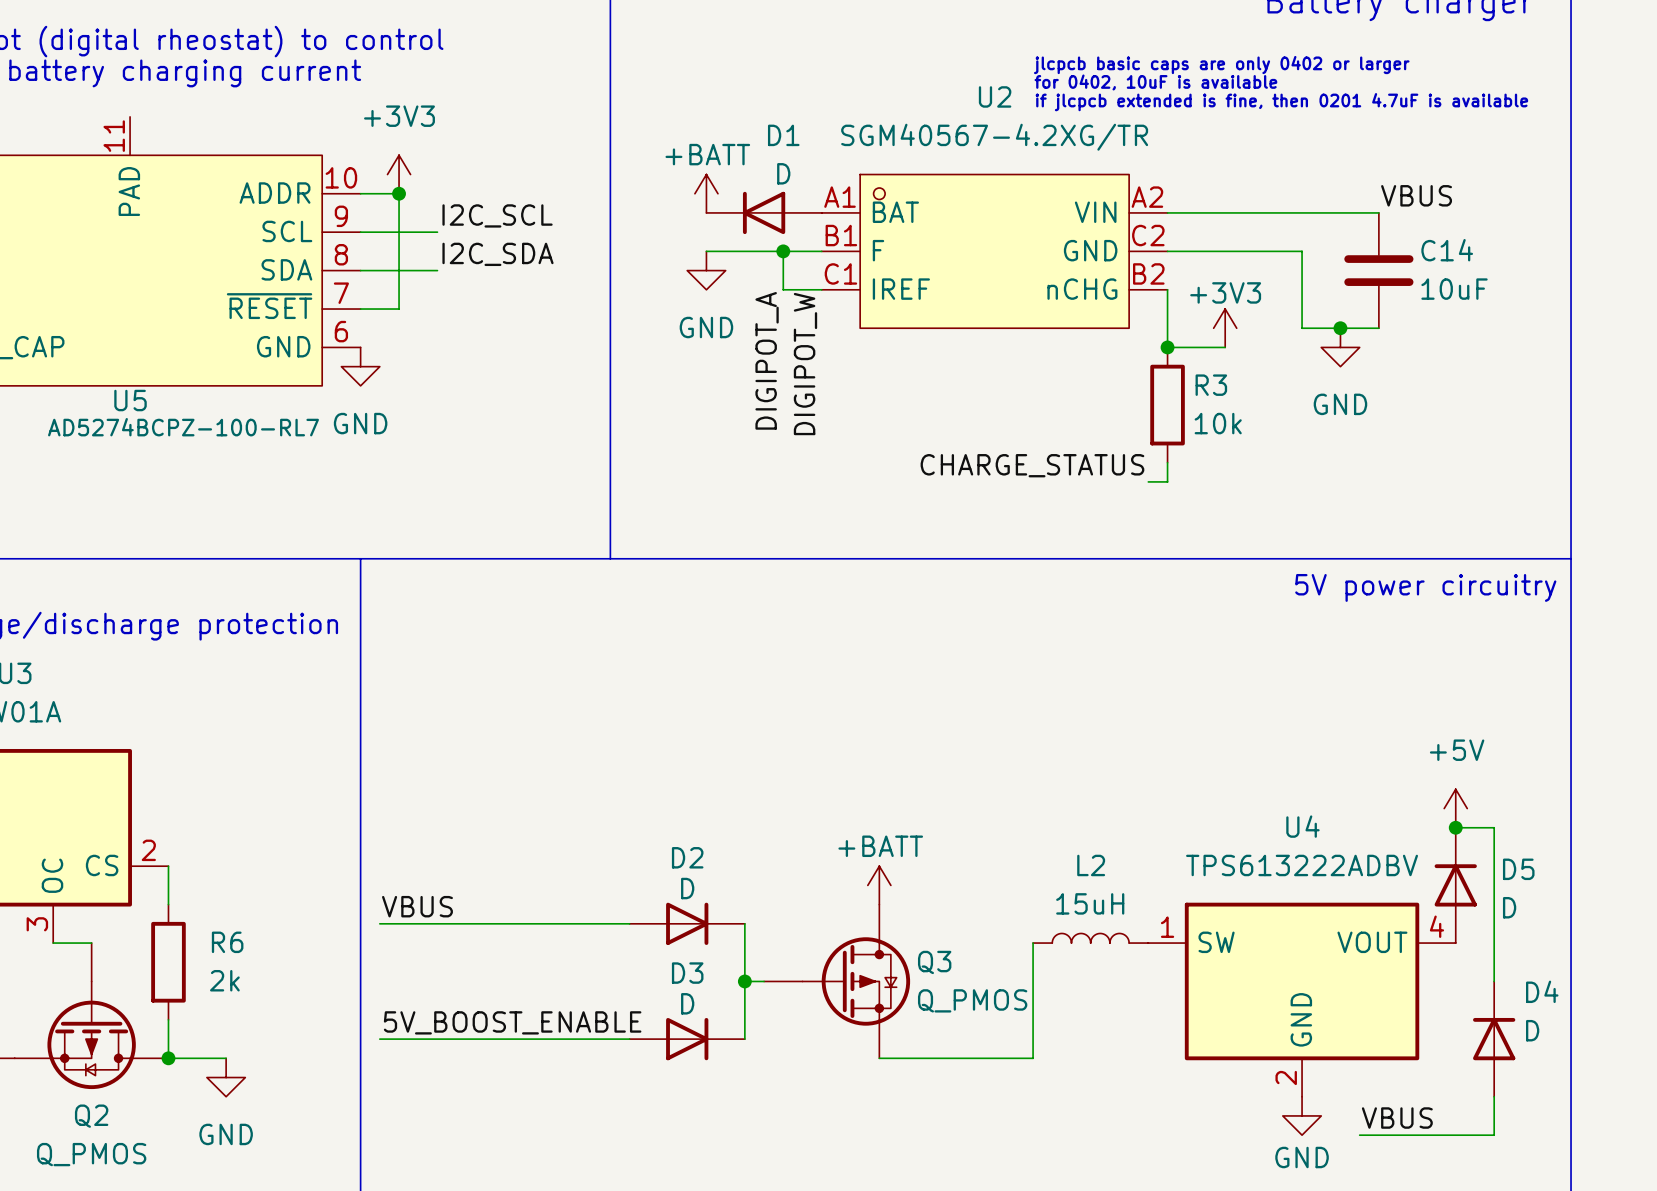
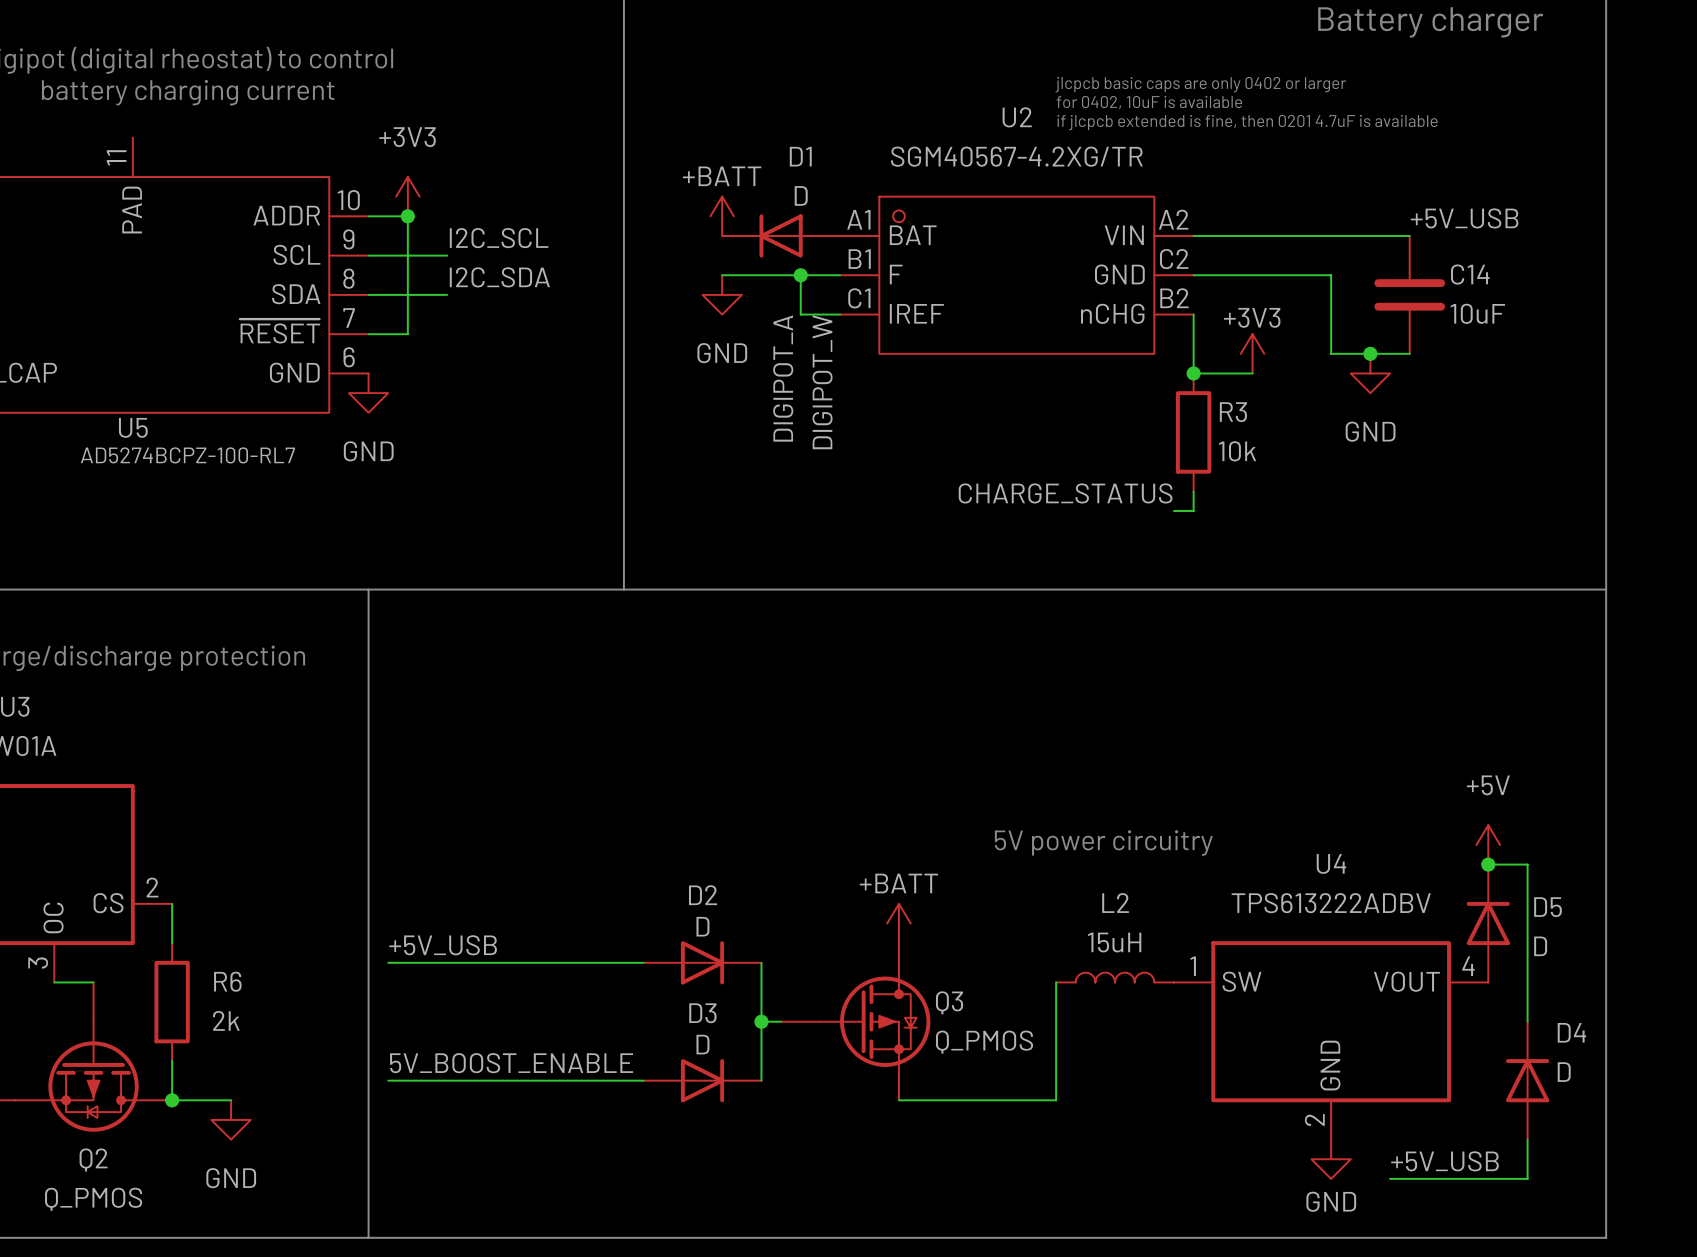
label: VBUS (1416, 195) -> +5V_USB (1464, 218)
text: 5V power circuitry (1425, 587) -> none
text: none -> 5V power circuitry (1103, 843)
label: VBUS (417, 906) -> +5V_USB (443, 945)
label: VBUS (1397, 1118) -> +5V_USB (1444, 1161)

